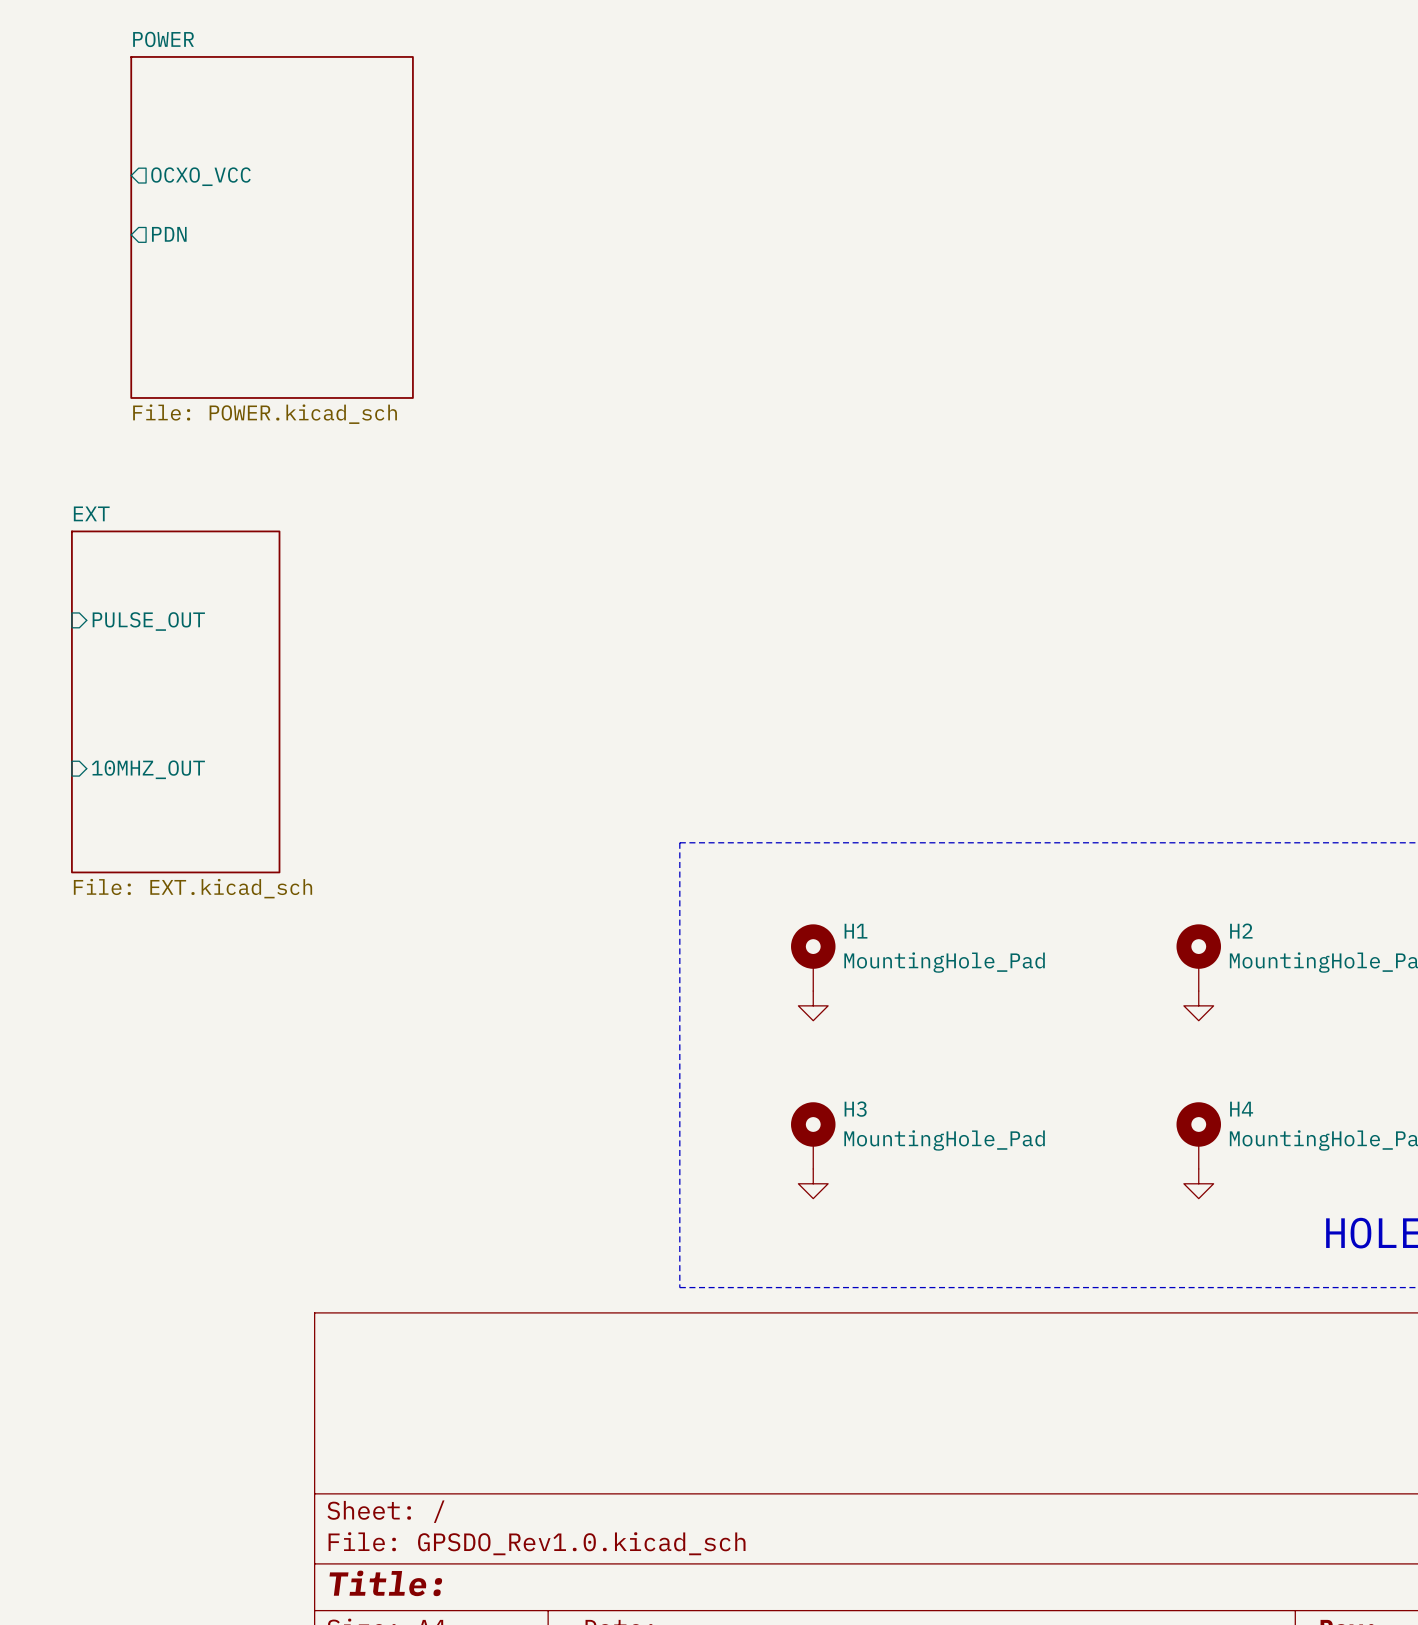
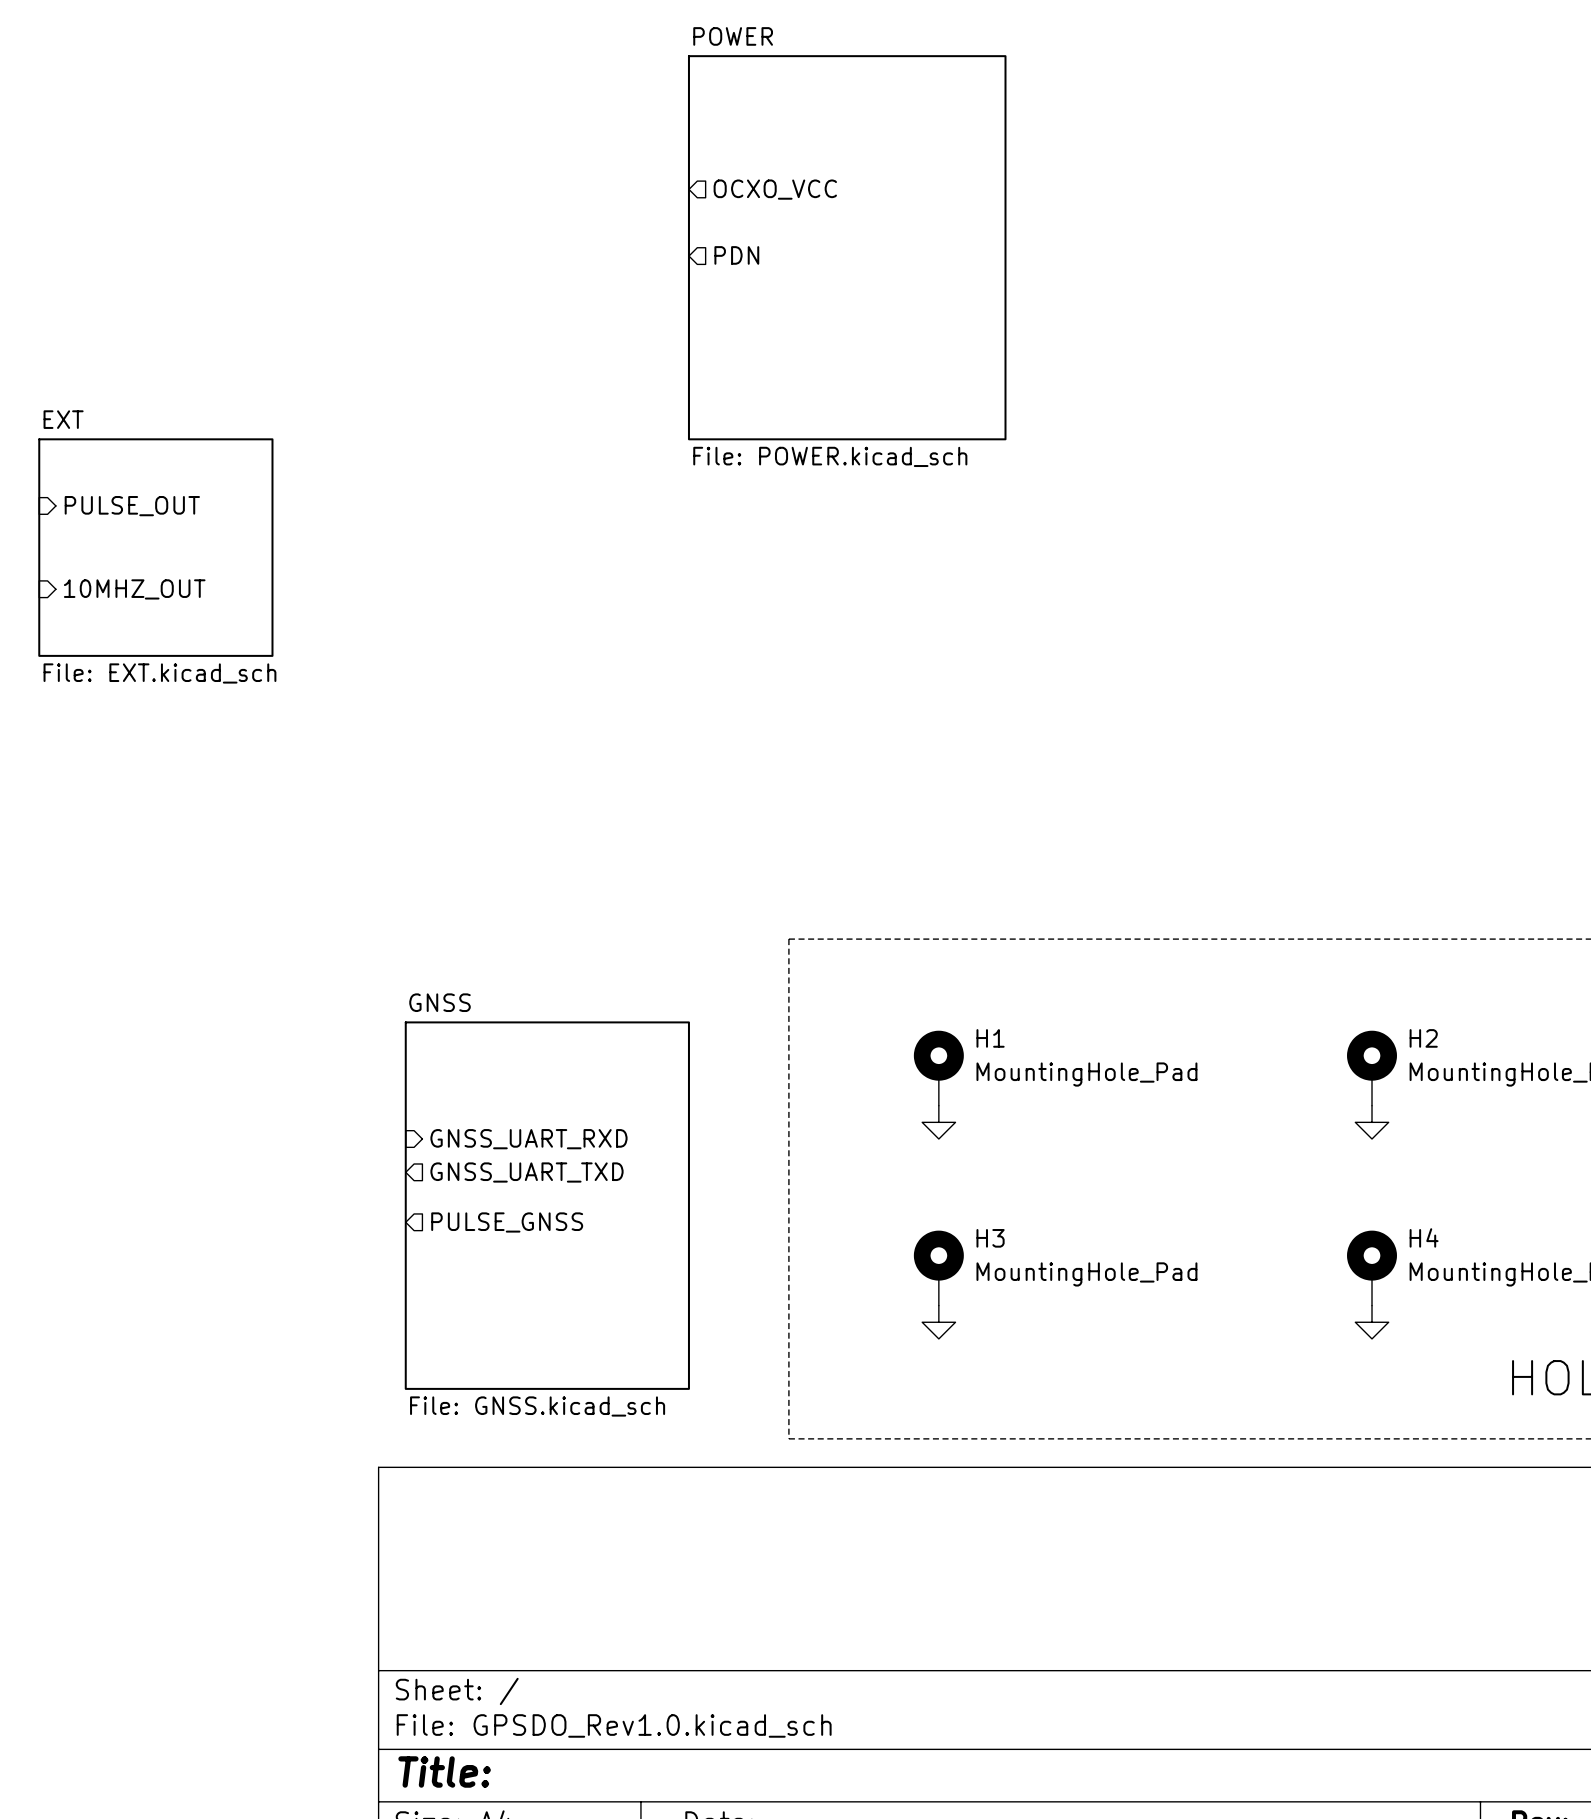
sheet pin: OCXO_VCC (200, 176) -> none
sheet pin: none -> OCXO_VCC (775, 189)
sheet POWER: File: POWER.kicad_sch (272, 227) -> none
sheet POWER: none -> File: POWER.kicad_sch (847, 247)
sheet pin: PDN (169, 234) -> none
sheet pin: none -> PDN (736, 255)
sheet EXT: none -> File: EXT.kicad_sch (155, 547)
sheet pin position: PULSE_OUT (148, 621) -> PULSE_OUT (132, 506)
sheet EXT: File: EXT.kicad_sch (175, 701) -> none
sheet pin position: 10MHZ_OUT (148, 769) -> 10MHZ_OUT (134, 589)
sheet pin: none -> GNSS_UART_RXD (528, 1139)
sheet pin: none -> GNSS_UART_TXD (527, 1172)
sheet GNSS: none -> File: GNSS.kicad_sch (547, 1205)
sheet pin: none -> PULSE_GNSS (507, 1222)

